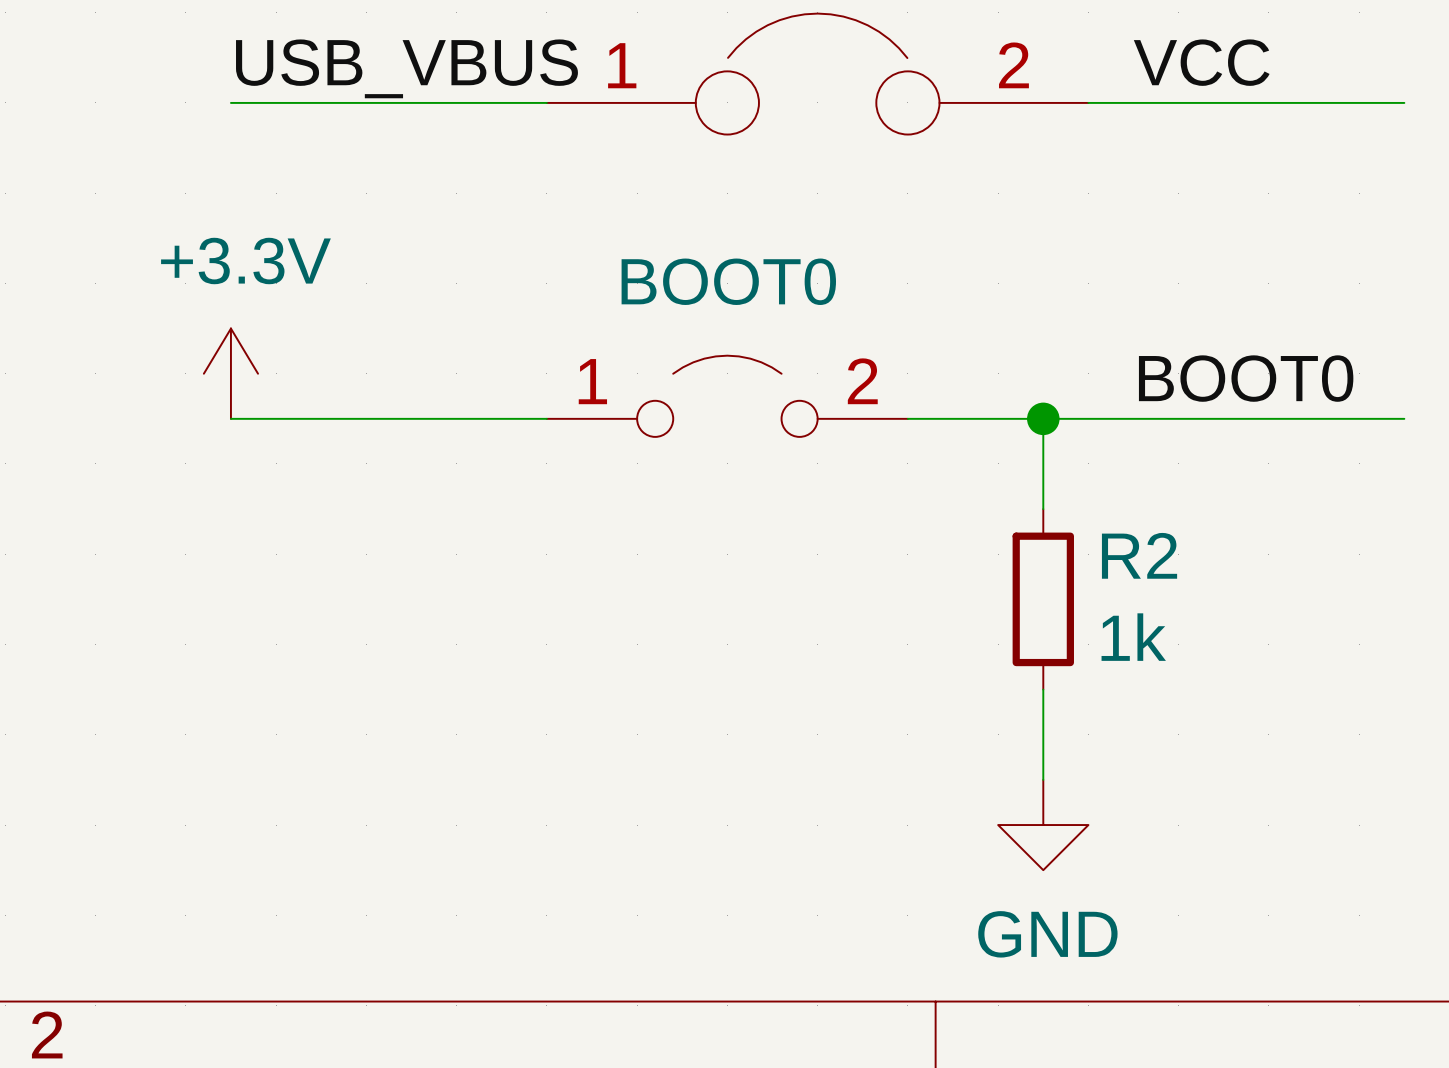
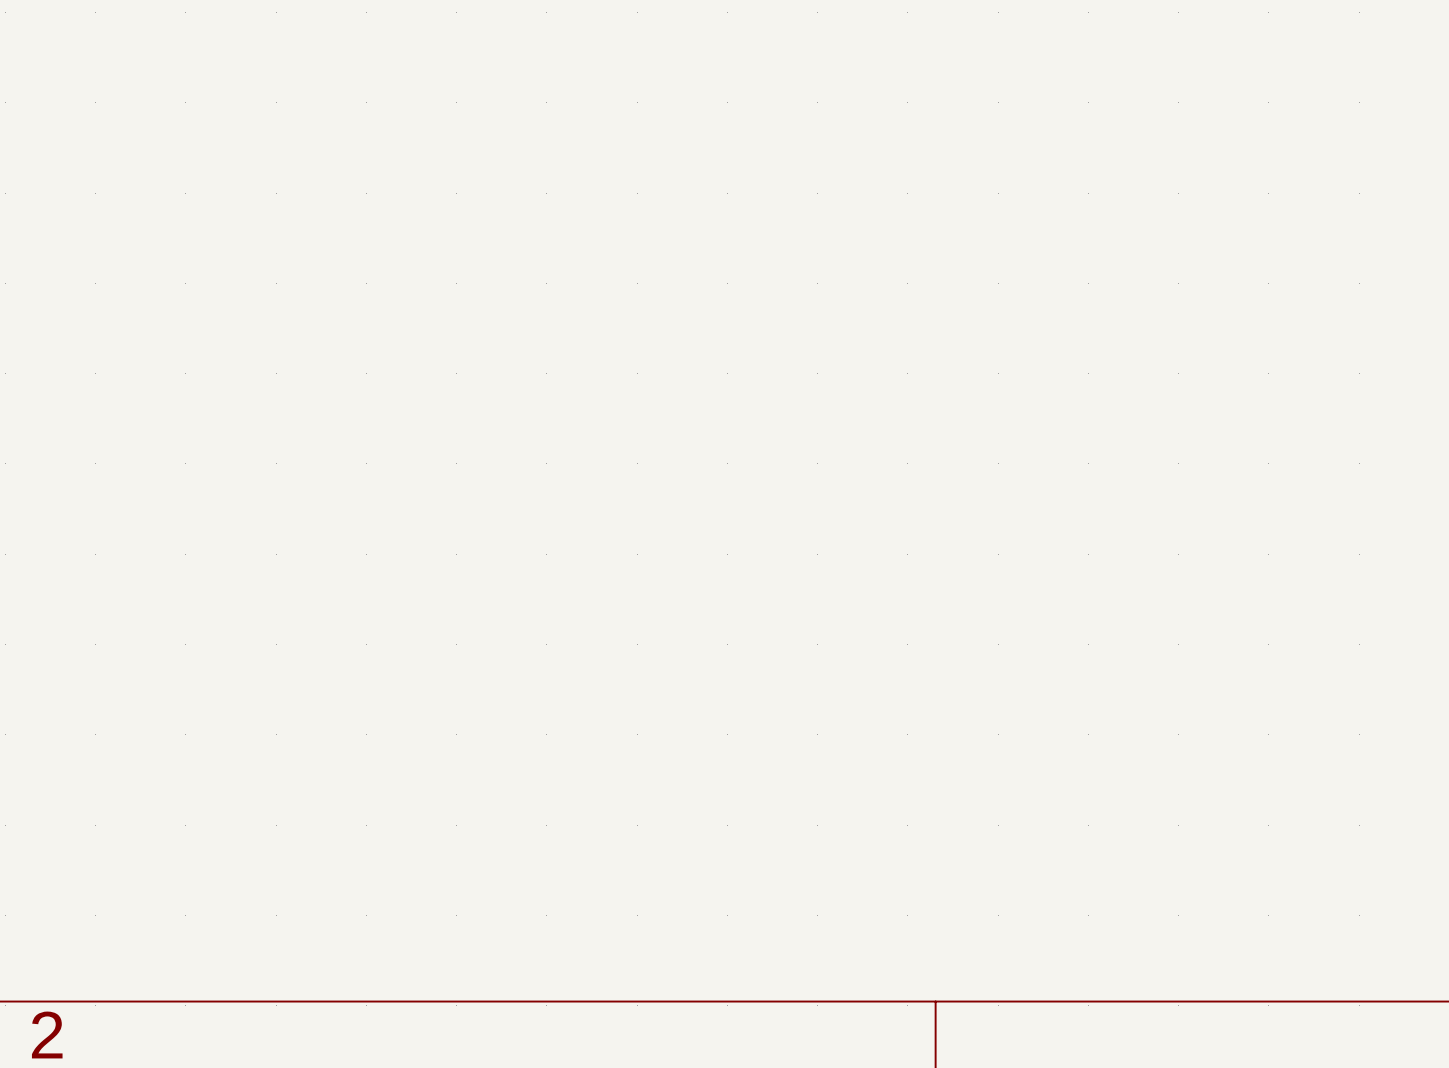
label: VCC (1201, 62) -> none
label: USB_VBUS (406, 68) -> none
part: (817, 74) -> none
wire: (230, 102) (546, 102) -> none
wire: (1088, 102) (1404, 102) -> none
power symbol: +3.3V (230, 373) -> none
label: BOOT0 (1246, 378) -> none
BOOT0: (727, 396) -> none
wire: (230, 418) (546, 418) -> none
wire: (907, 418) (1404, 418) -> none
wire: (1043, 418) (1043, 509) -> none
junction: (1043, 418) -> none
R2: 1k (1043, 599) -> none
wire: (1043, 689) (1043, 779) -> none
power symbol: GND (1043, 825) -> none

